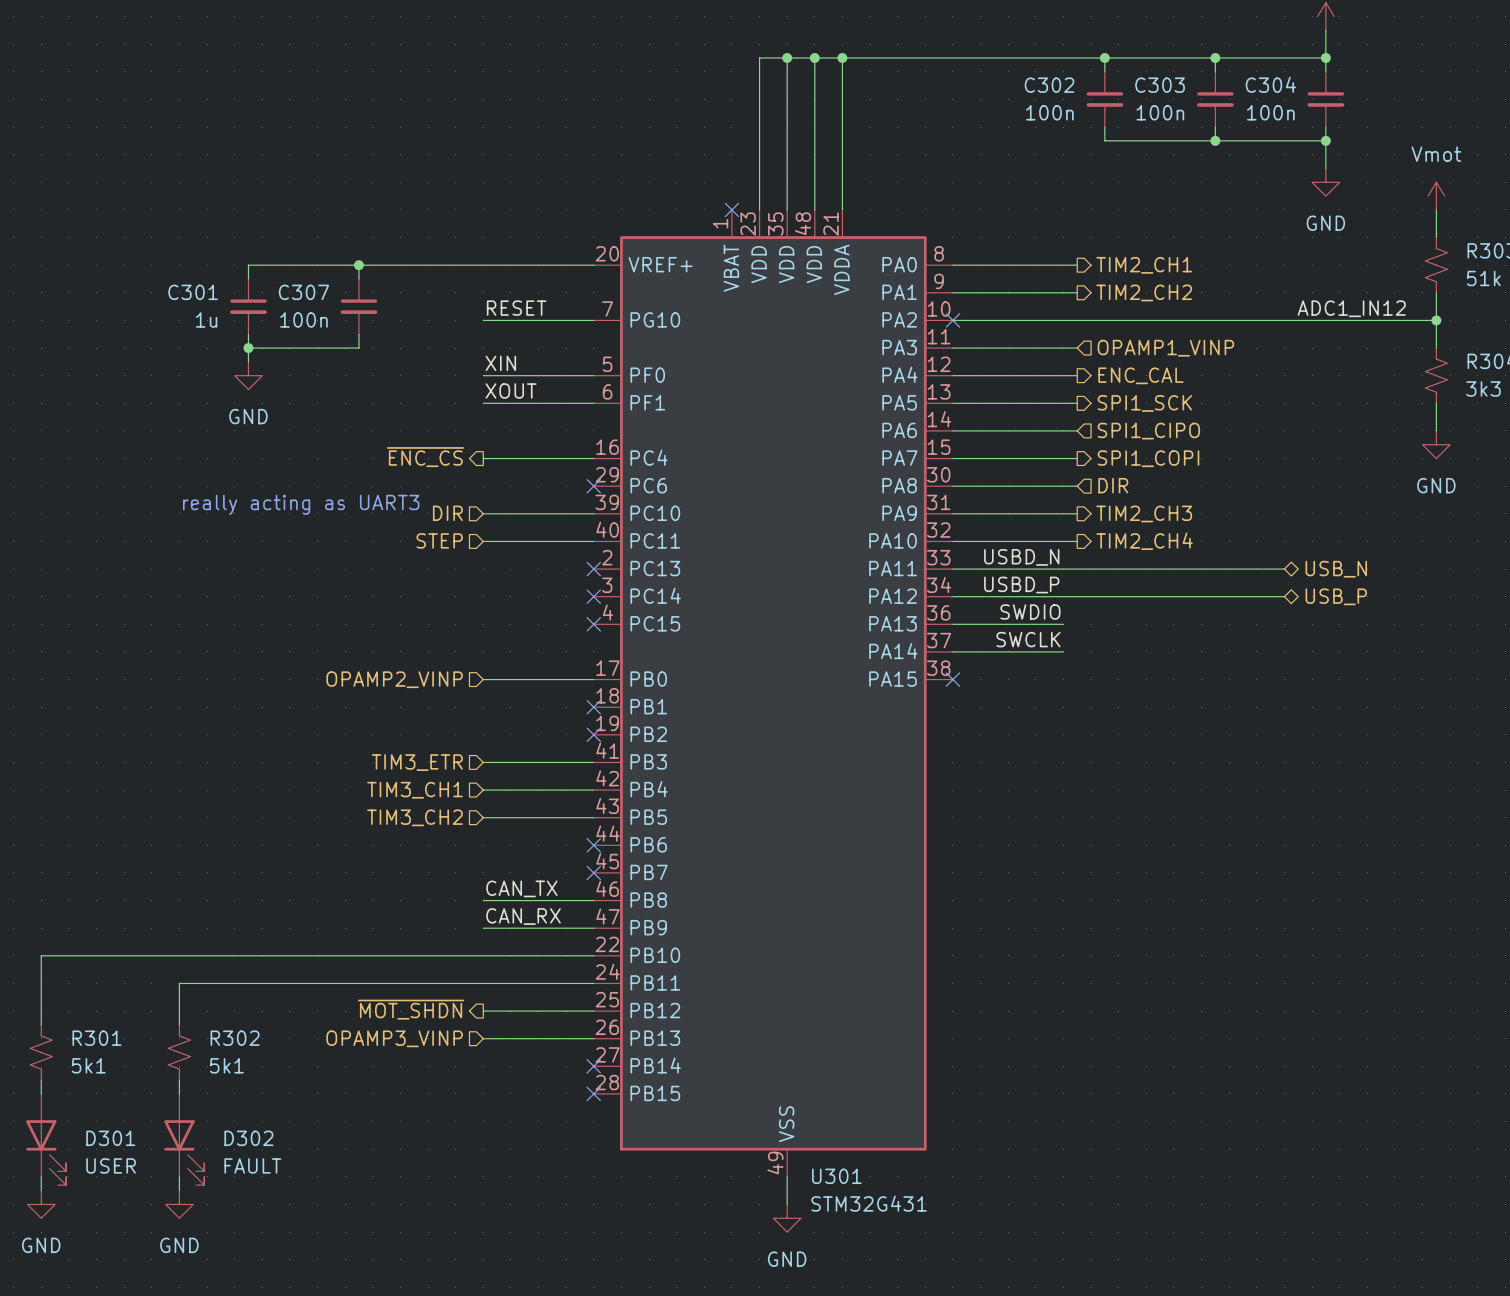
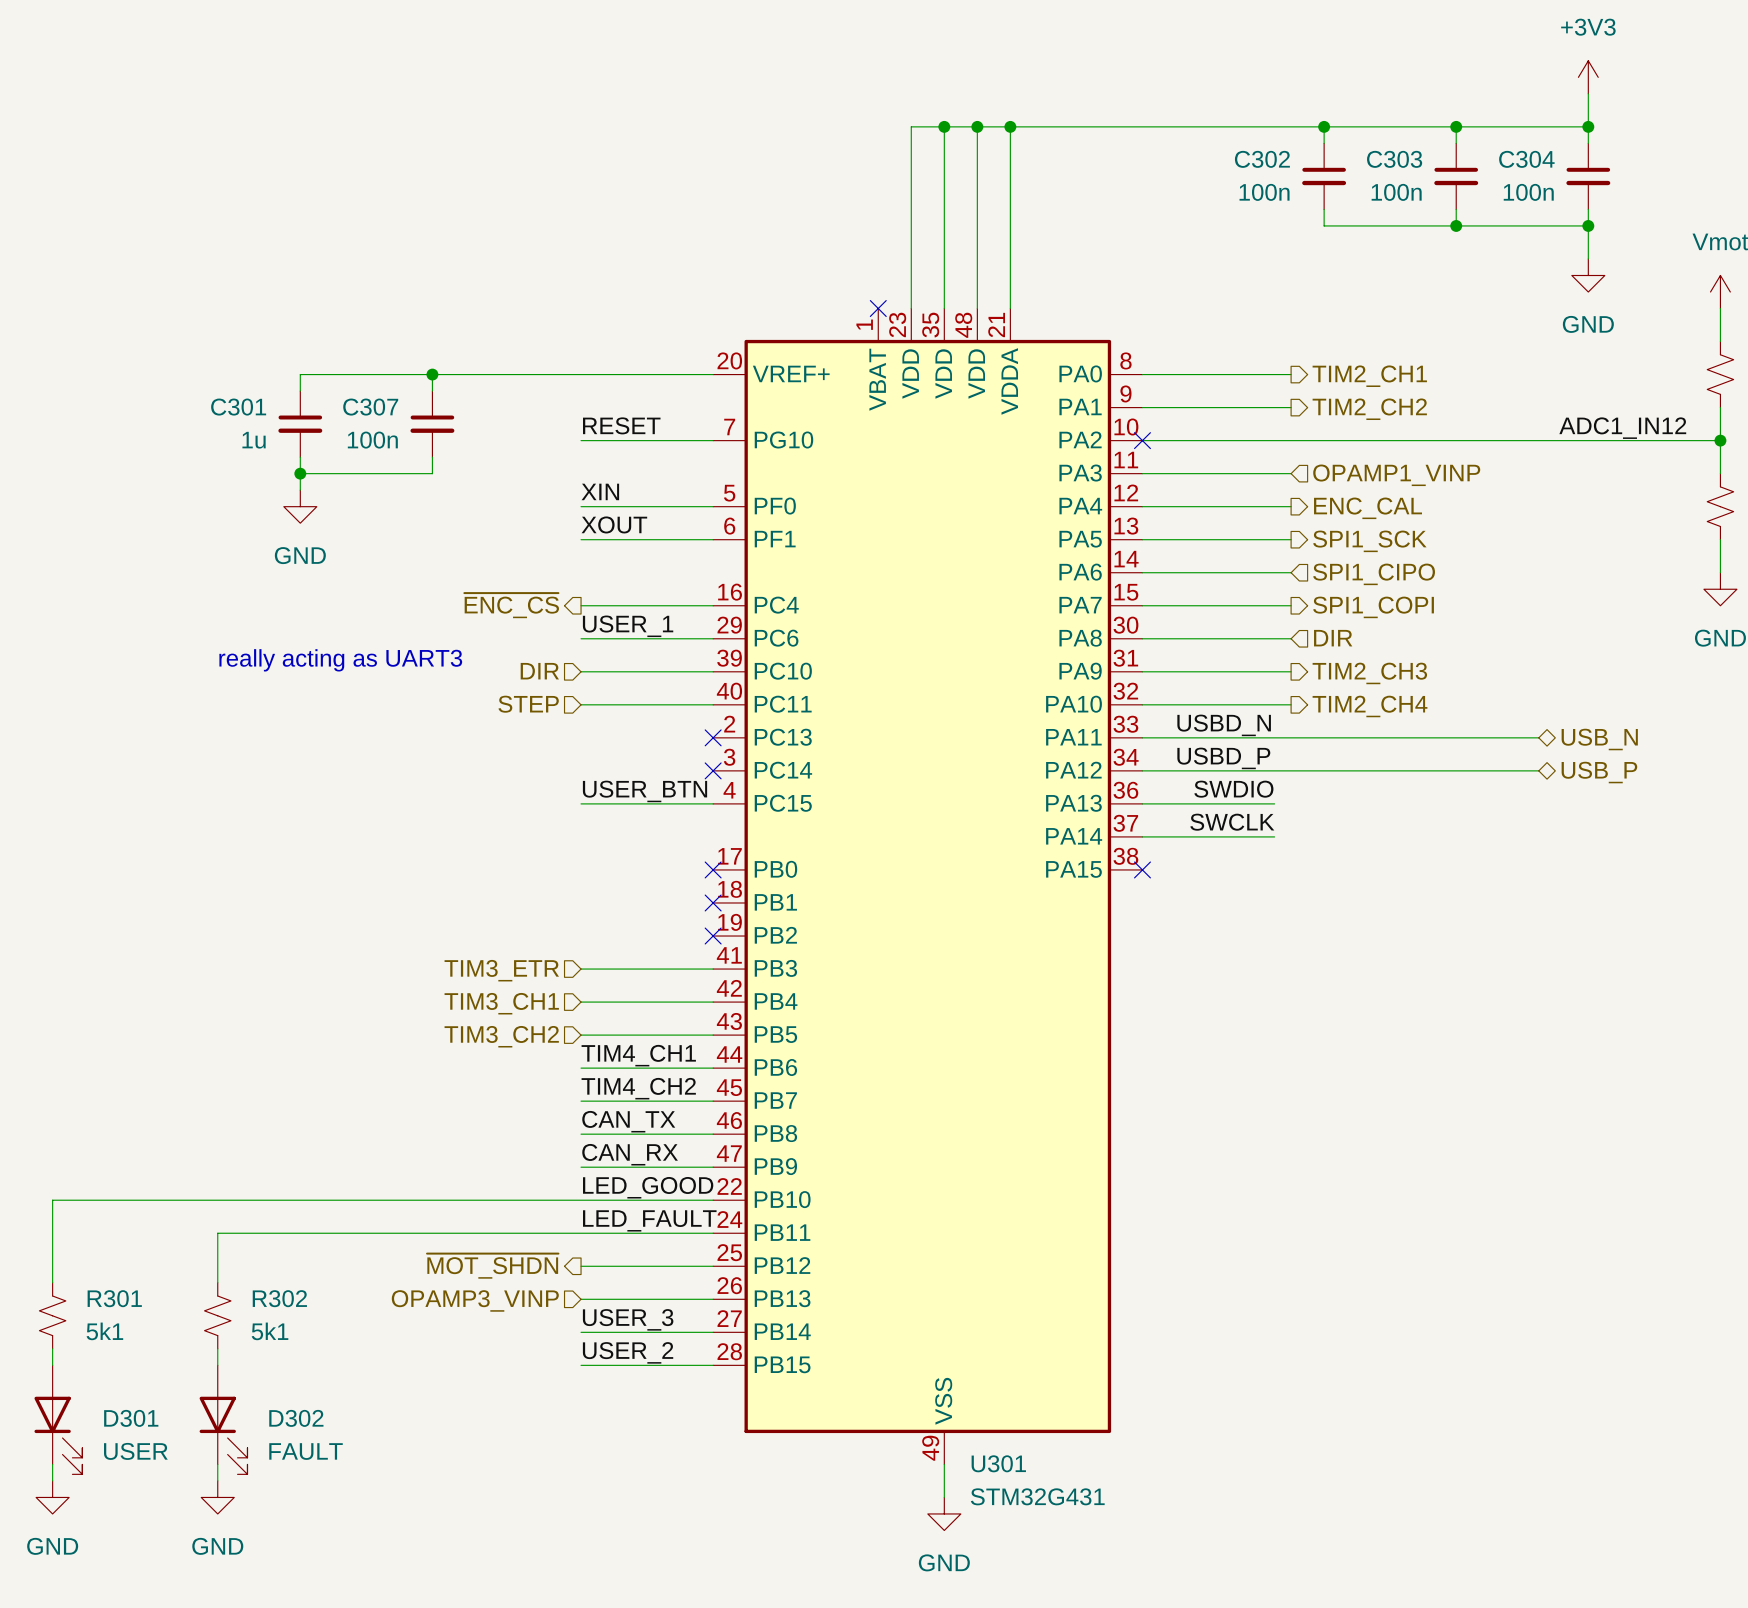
label: none -> USER_1 (628, 626)
wire: none -> (581, 638) (713, 638)
no-connect mark: (593, 486) -> none
label: none -> USER_BTN (645, 791)
no-connect mark position: (593, 624) -> (713, 869)
hierarchical label: OPAMP2_VINP (394, 679) -> none
wire: (483, 679) (593, 679) -> (581, 803) (713, 803)
label: none -> TIM4_CH1 (638, 1055)
wire: none -> (581, 1068) (713, 1068)
no-connect mark: (593, 845) -> none
label: none -> TIM4_CH2 (638, 1088)
wire: none -> (581, 1101) (713, 1101)
no-connect mark: (593, 872) -> none
label: none -> LED_GOOD (648, 1187)
label: none -> LED_FAULT (649, 1220)
label: none -> USER_3 (628, 1319)
wire: none -> (581, 1332) (713, 1332)
no-connect mark: (593, 1066) -> none
label: none -> USER_2 (628, 1352)
wire: none -> (581, 1365) (713, 1365)
no-connect mark: (593, 1093) -> none

